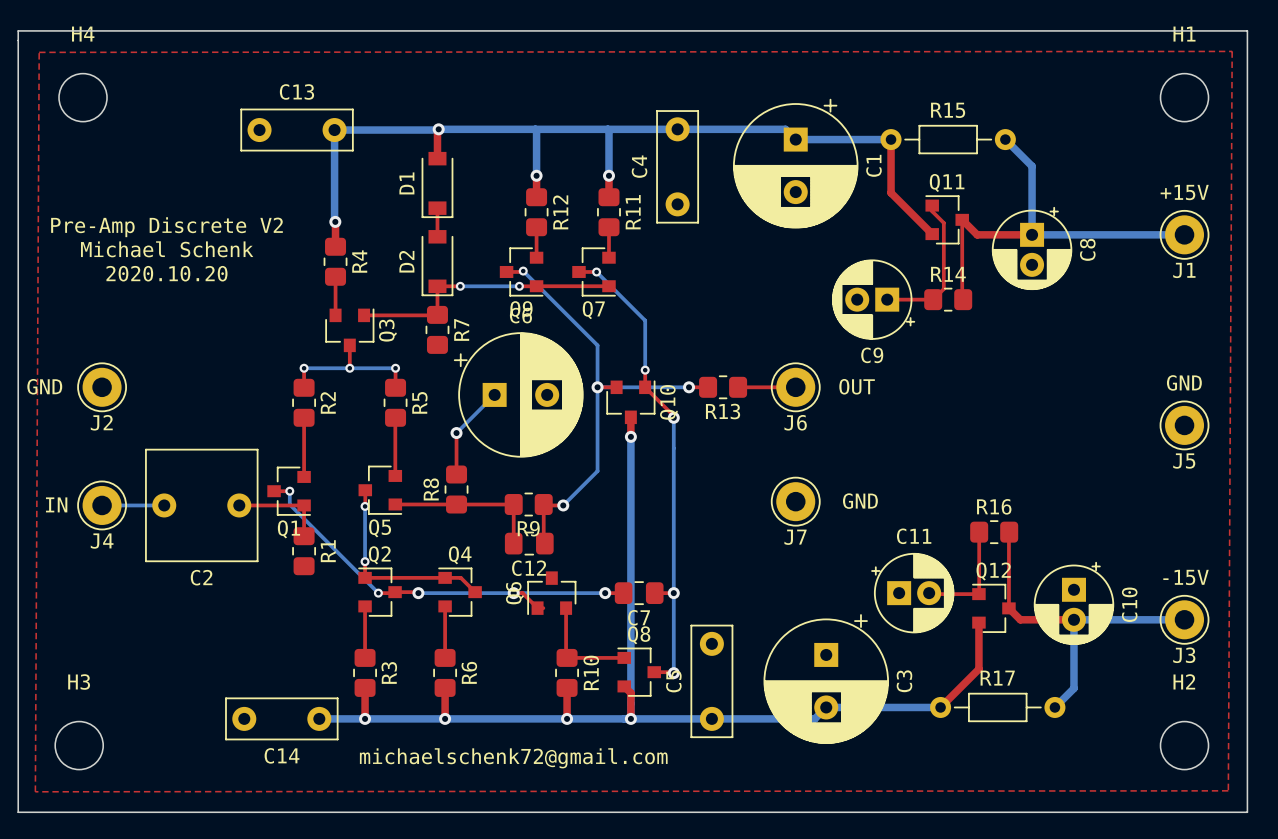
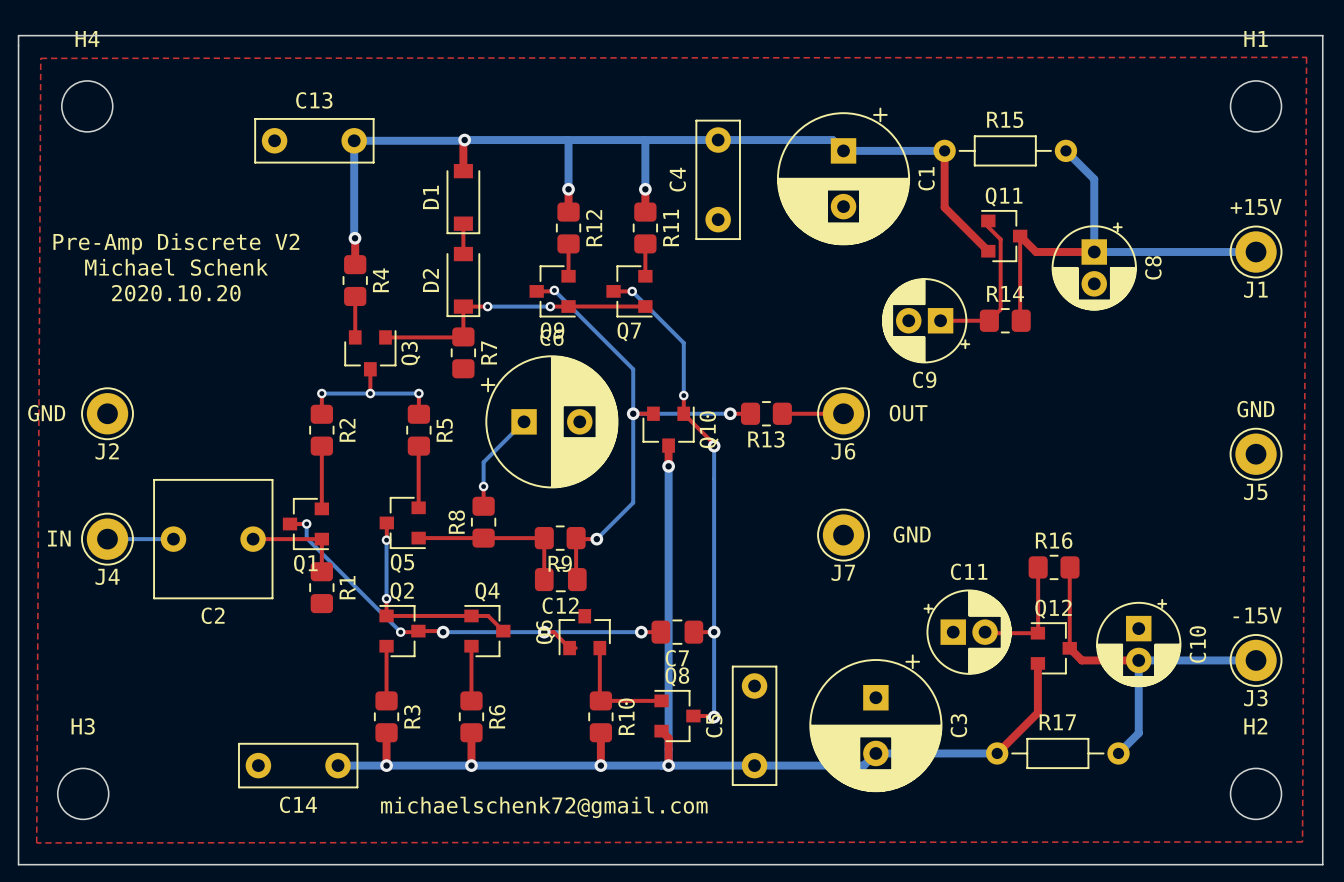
top track: (456, 433) (456, 455) -> none
bottom track: none -> (483, 462) (483, 486)
via: (456, 433) -> none
via: none -> (483, 486)

